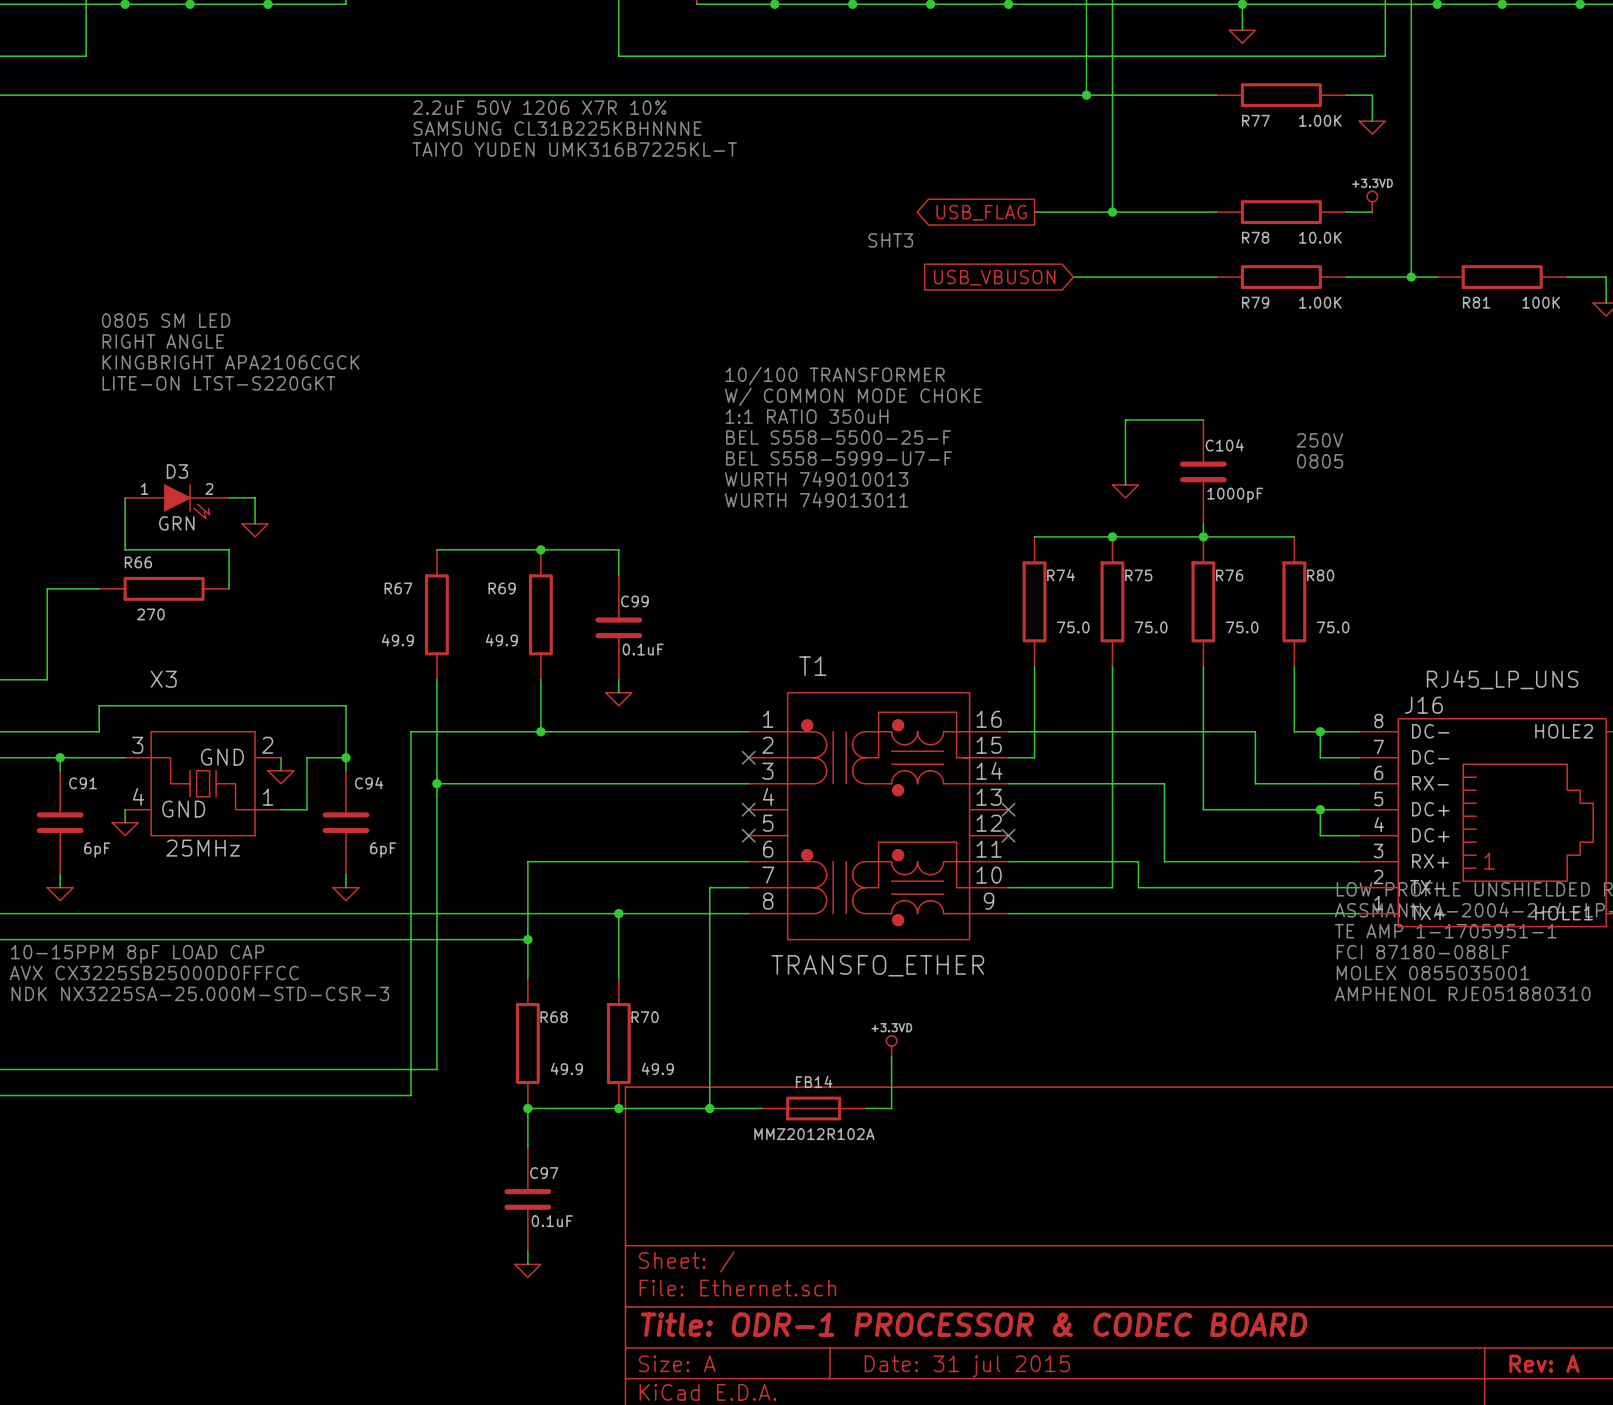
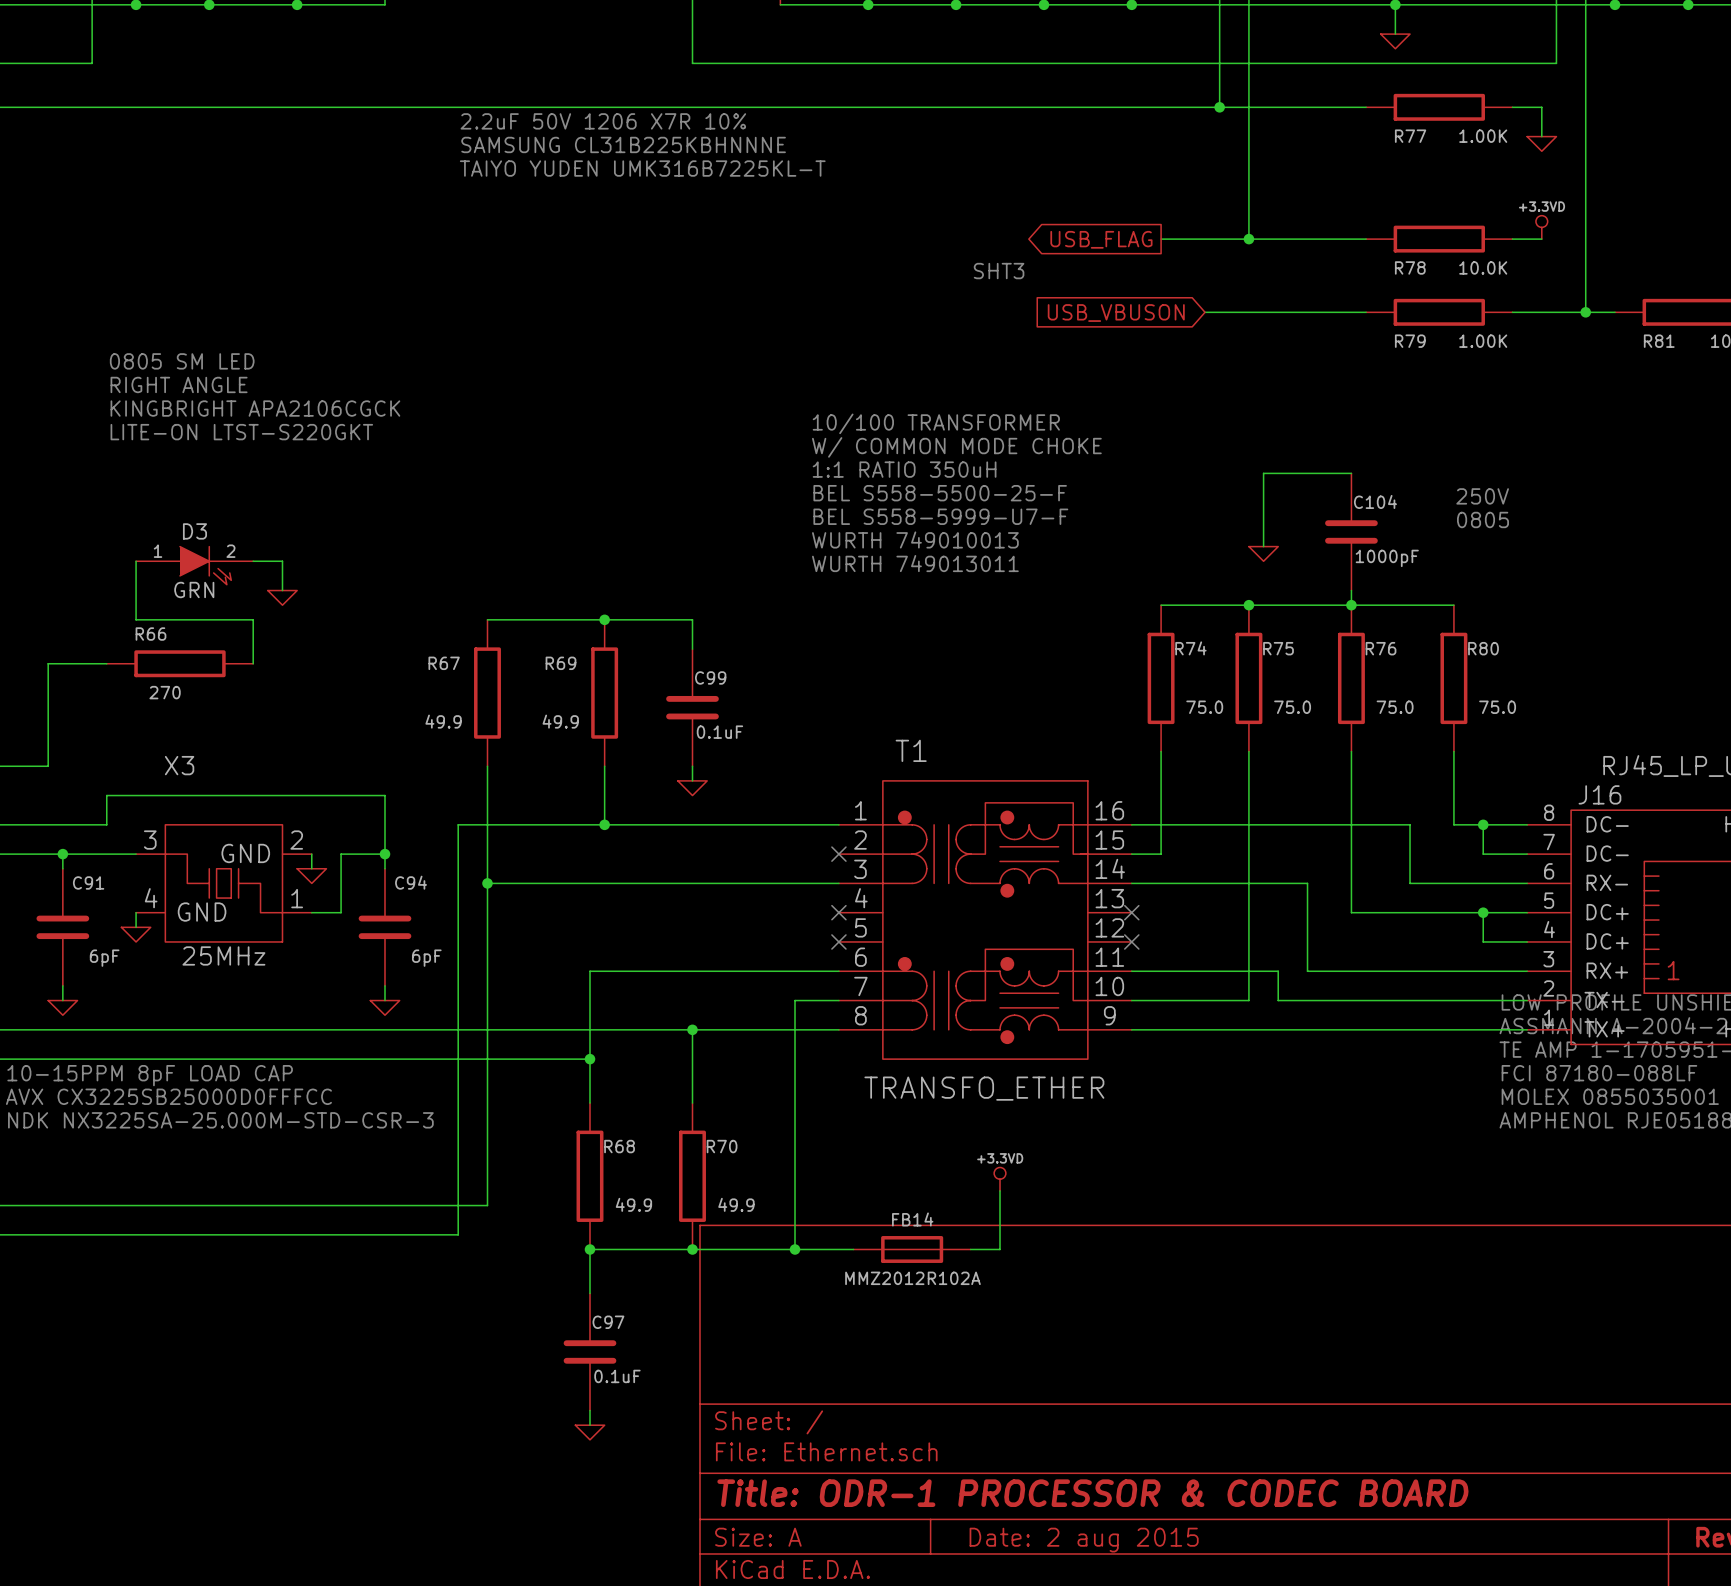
title block: Date: 31 jul 2015 (967, 1366) -> Date: 2 aug 2015 (1084, 1540)

